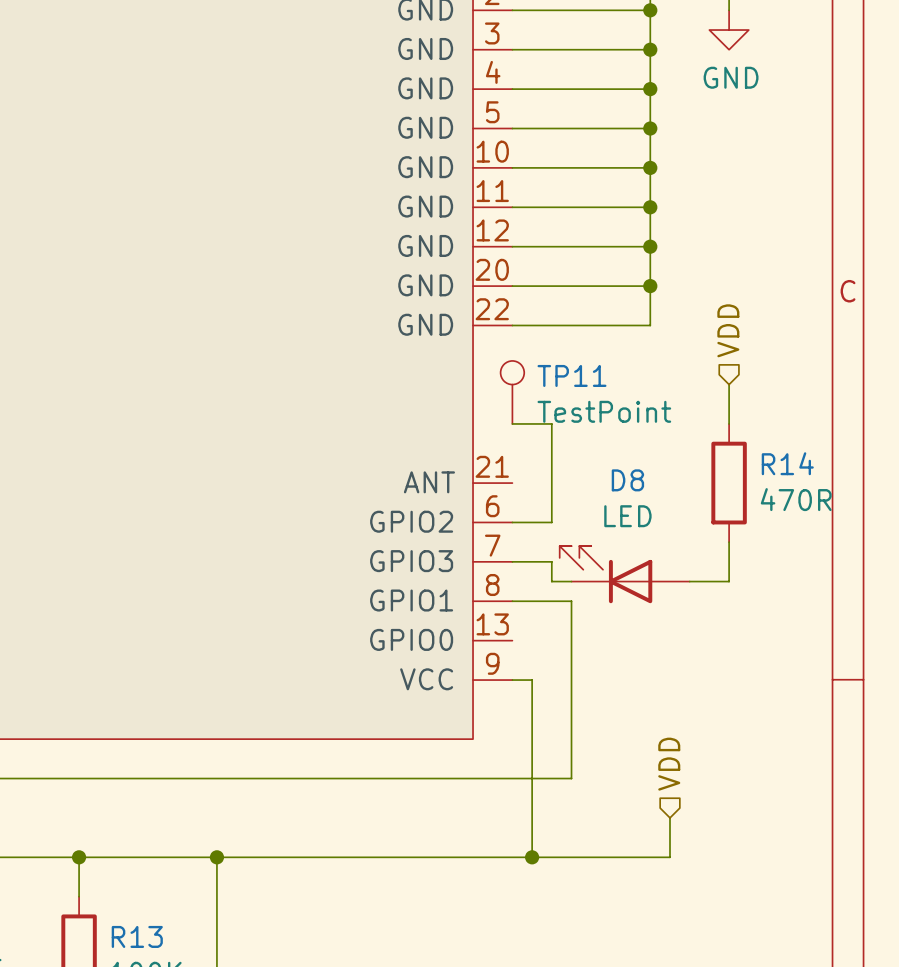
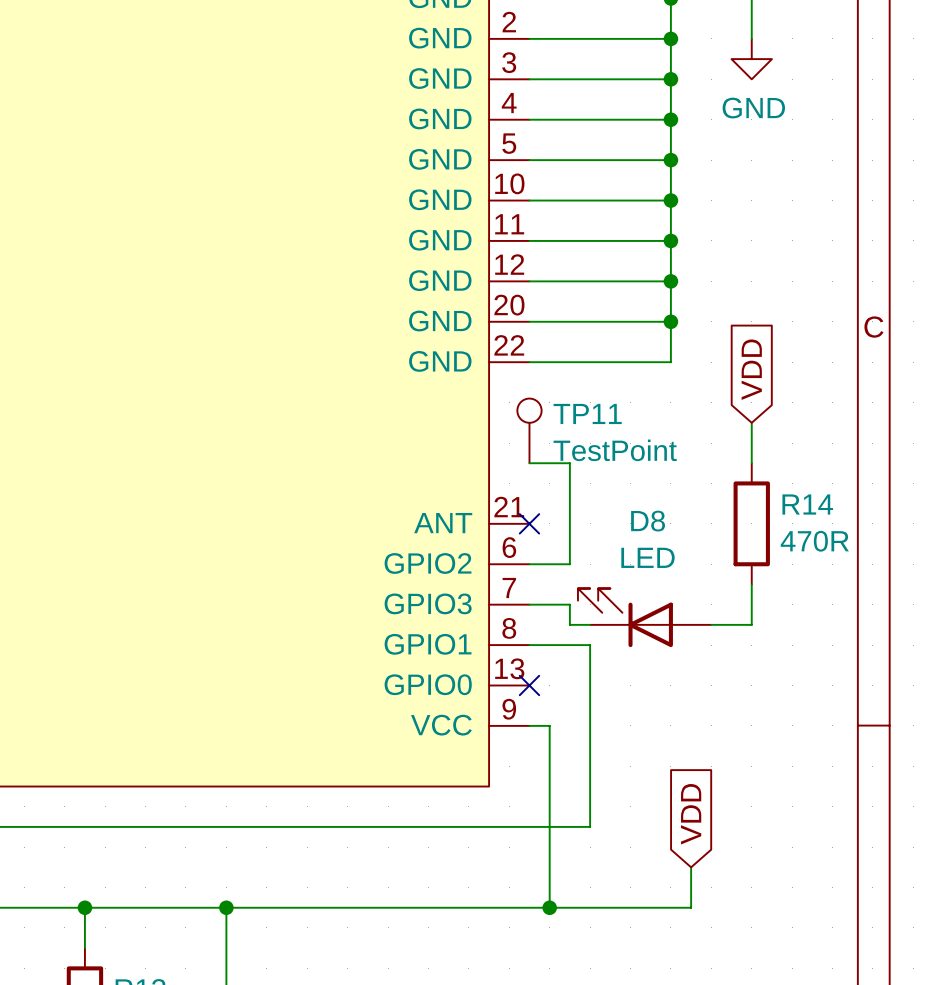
hierarchical label: VDD (728, 330) -> none
global label: none -> VDD (751, 369)
no-connect mark: none -> (529, 523)
no-connect mark: none -> (529, 685)
hierarchical label: VDD (669, 764) -> none
global label: none -> VDD (691, 814)

